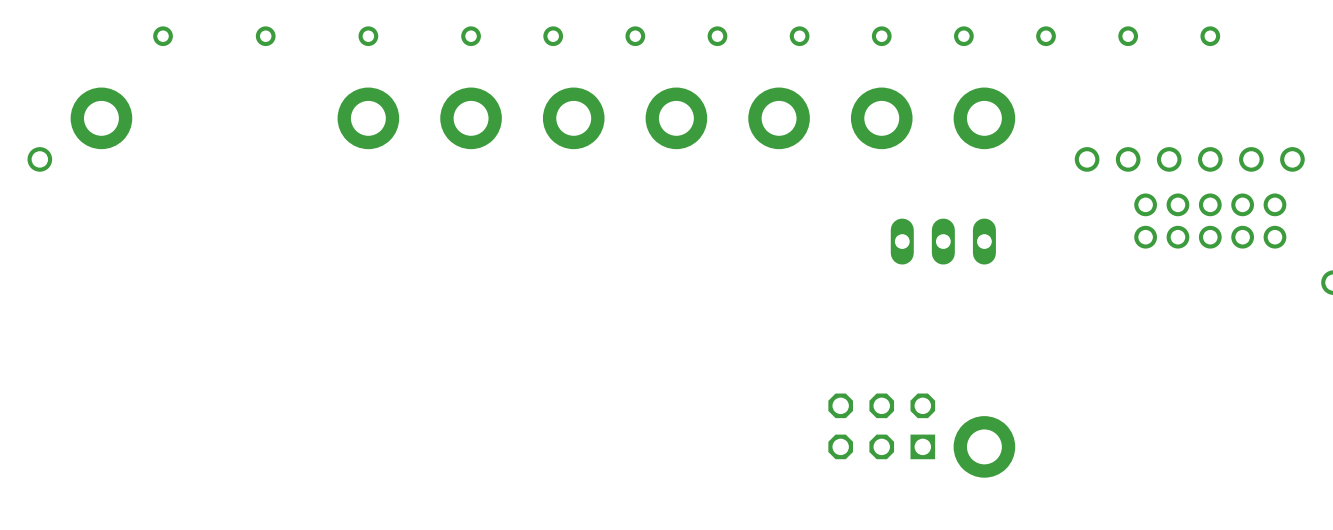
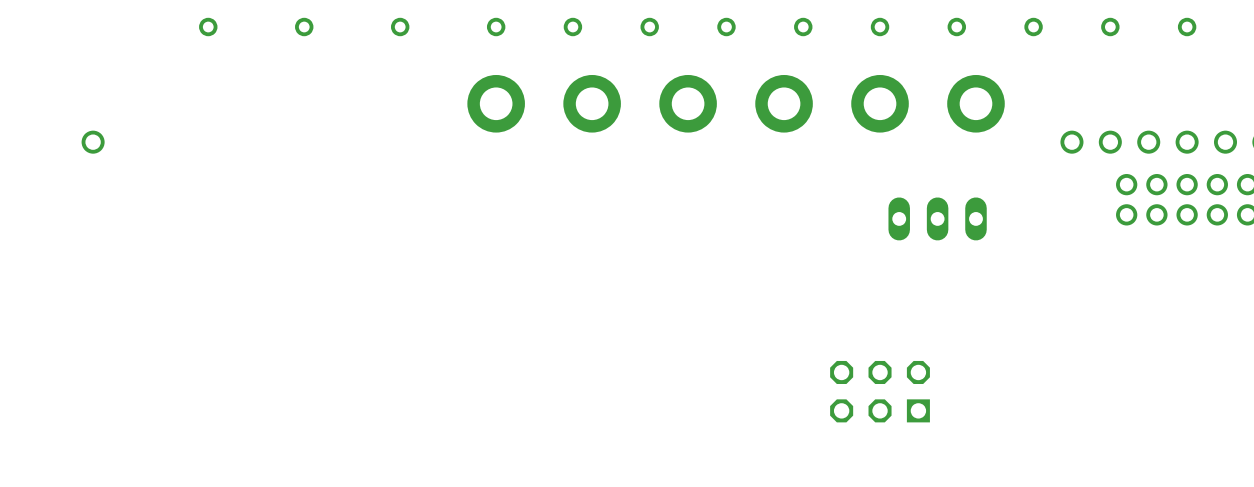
part: (101, 118) -> none
part: (368, 118) -> none
part: (984, 446) -> none

